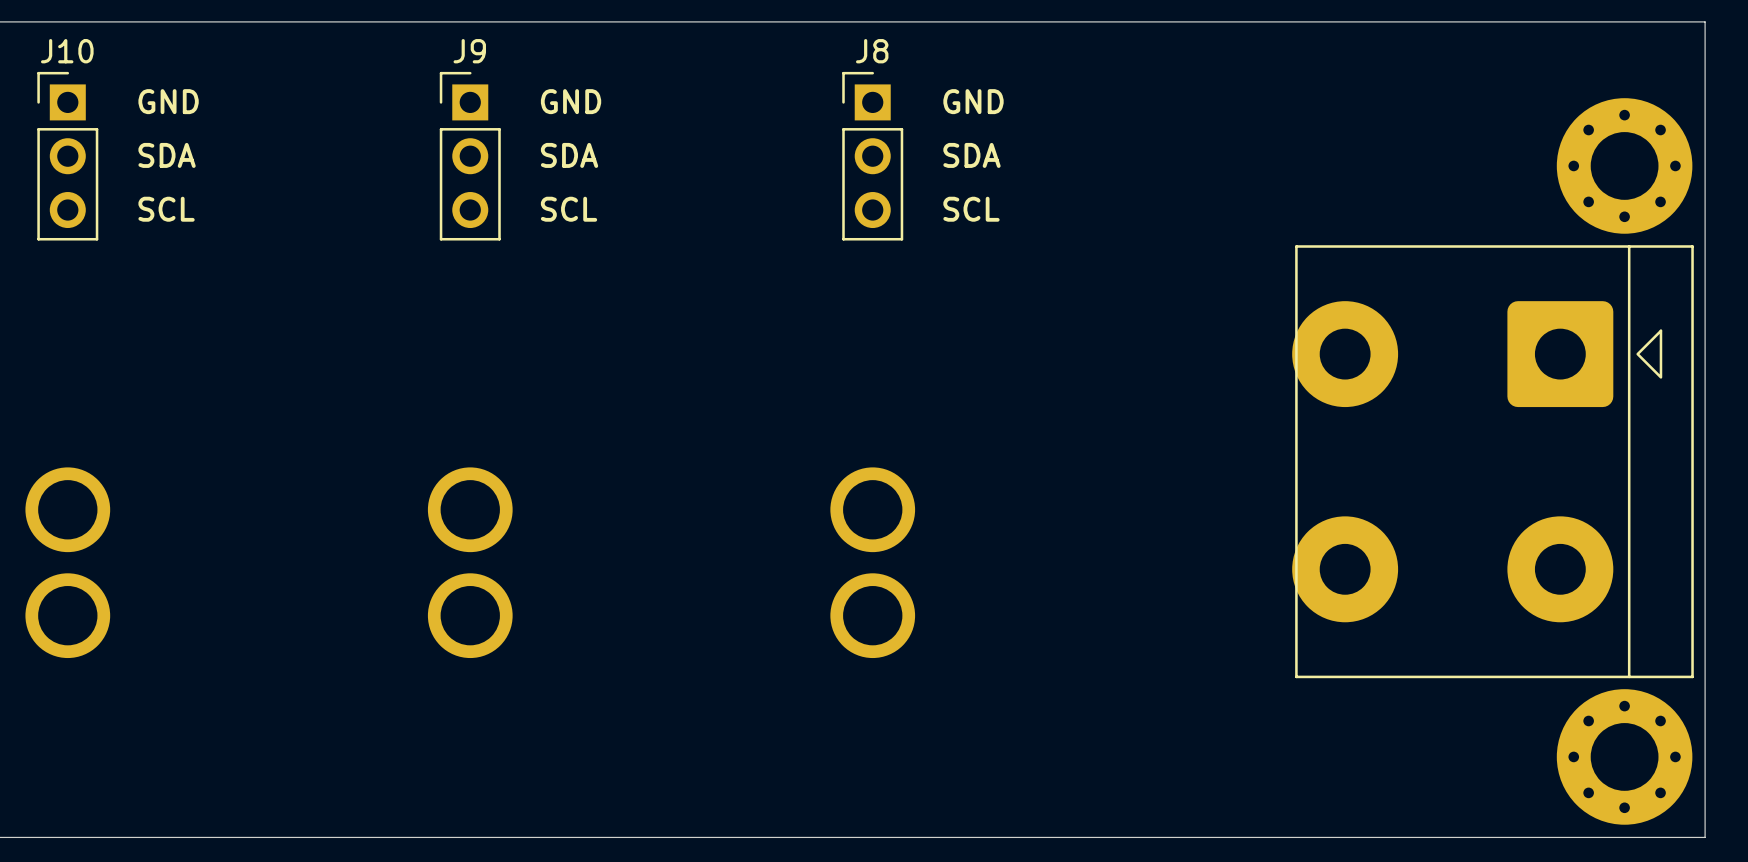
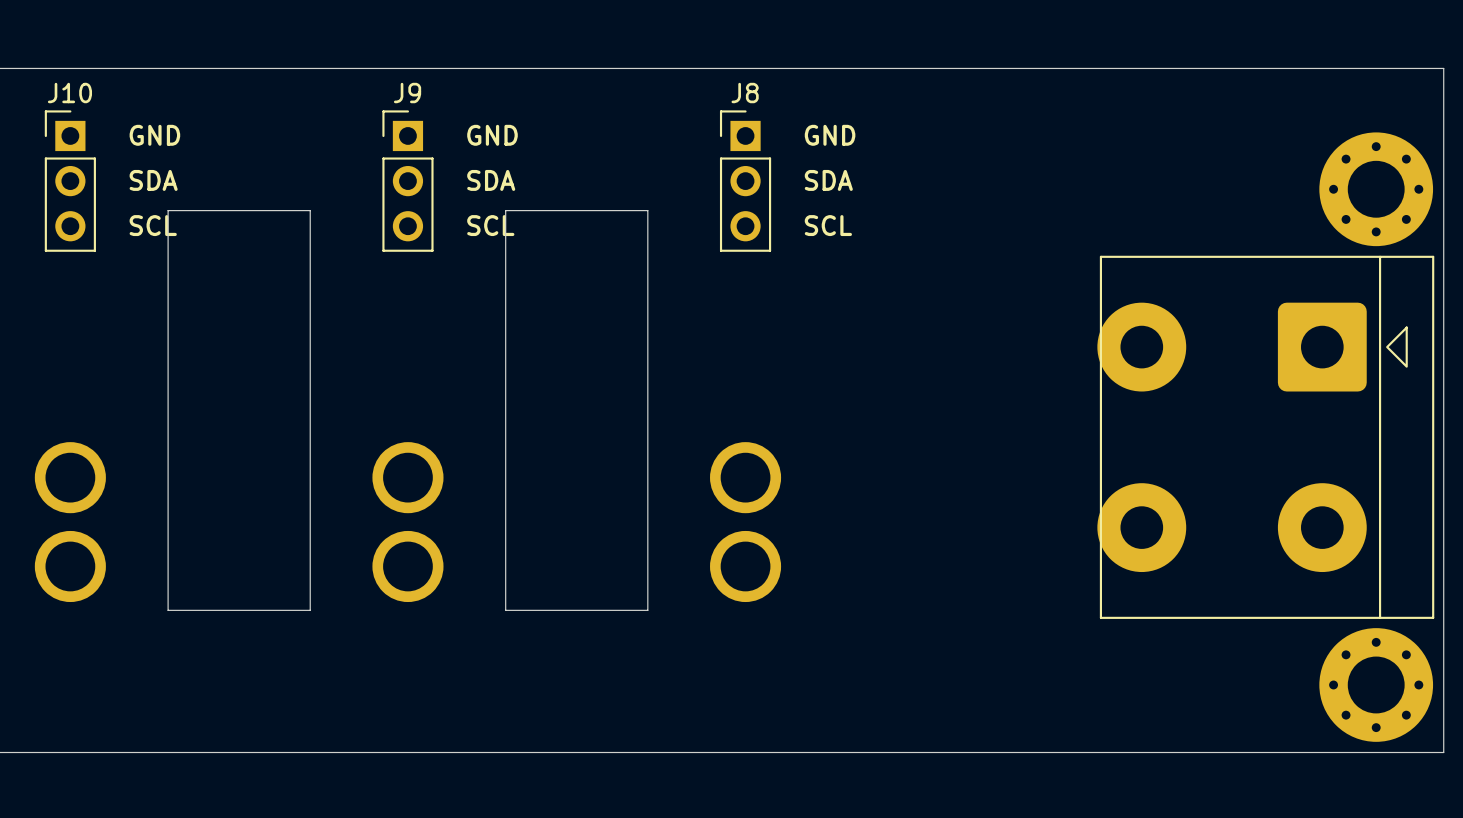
board edge: none -> (310, 210) (168, 210) (168, 610) (310, 610) (310, 210)
board edge: none -> (647, 210) (505, 210) (505, 610) (647, 610) (647, 210)

